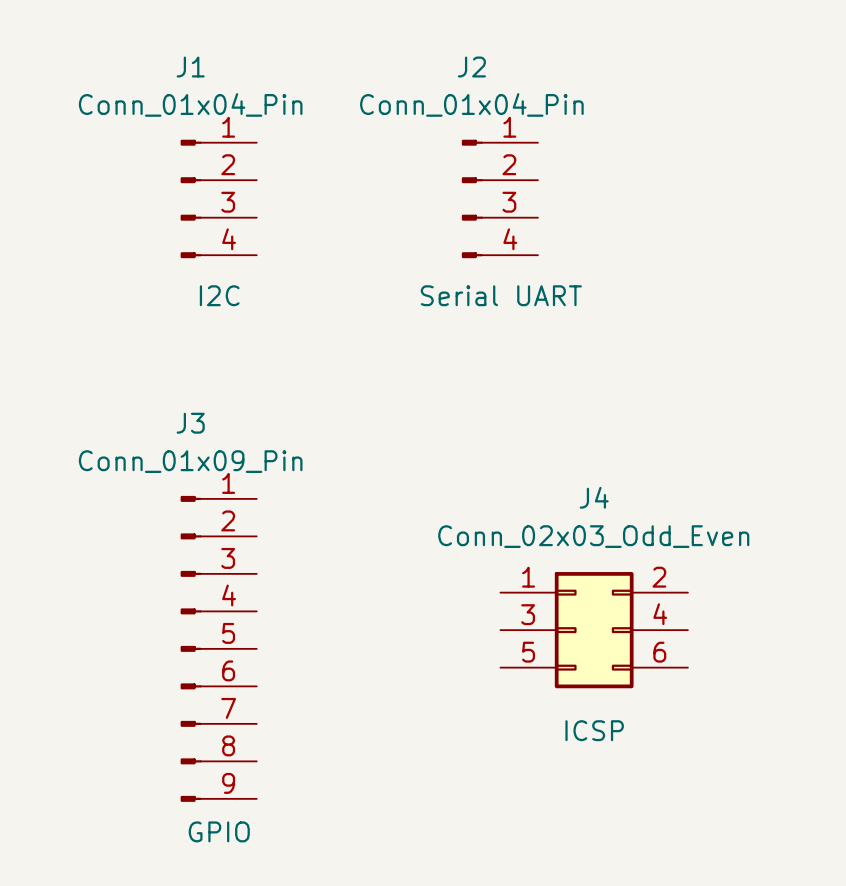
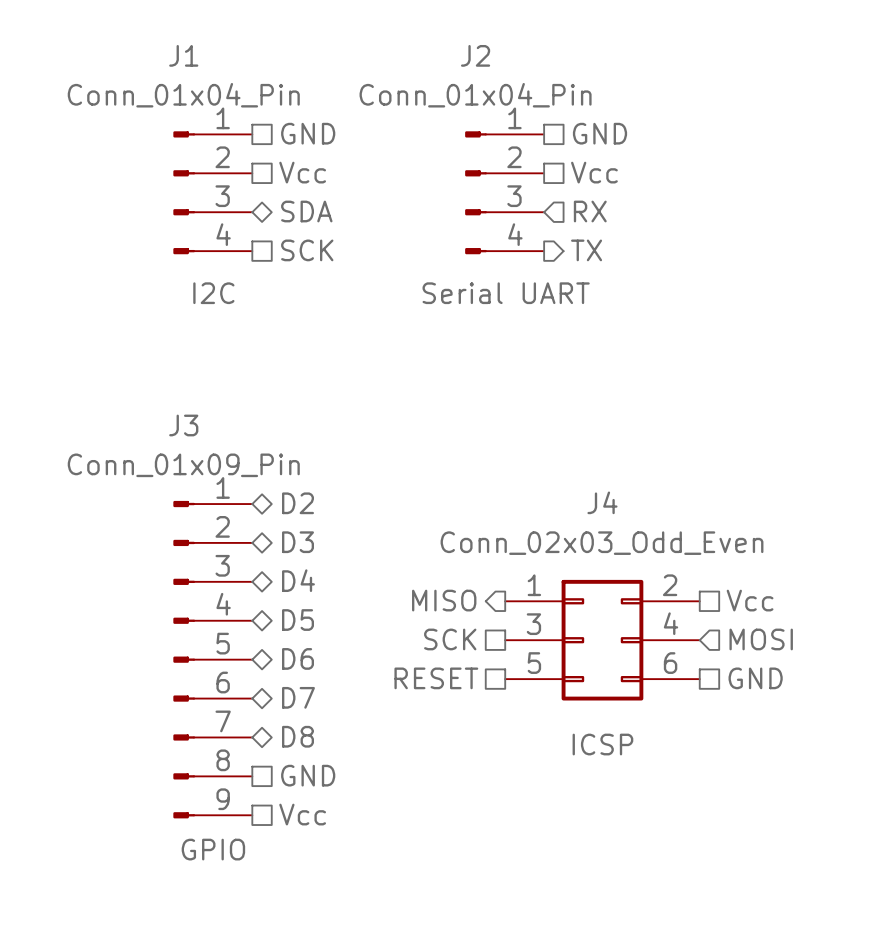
hierarchical label: none -> GND (308, 133)
hierarchical label: none -> GND (600, 133)
hierarchical label: none -> Vcc (302, 172)
hierarchical label: none -> Vcc (594, 172)
hierarchical label: none -> SDA (306, 211)
hierarchical label: none -> RX (590, 211)
hierarchical label: none -> SCK (307, 250)
hierarchical label: none -> TX (586, 250)
hierarchical label: none -> D2 (298, 503)
hierarchical label: none -> D3 (298, 542)
hierarchical label: none -> D4 (298, 580)
hierarchical label: none -> MISO (444, 600)
hierarchical label: none -> Vcc (750, 600)
hierarchical label: none -> D5 (298, 620)
hierarchical label: none -> SCK (450, 639)
hierarchical label: none -> MOSI (761, 639)
hierarchical label: none -> D6 (298, 658)
hierarchical label: none -> RESET (436, 678)
hierarchical label: none -> GND (755, 678)
hierarchical label: none -> D7 (298, 697)
hierarchical label: none -> D8 (298, 736)
hierarchical label: none -> GND (308, 775)
hierarchical label: none -> Vcc (302, 814)

